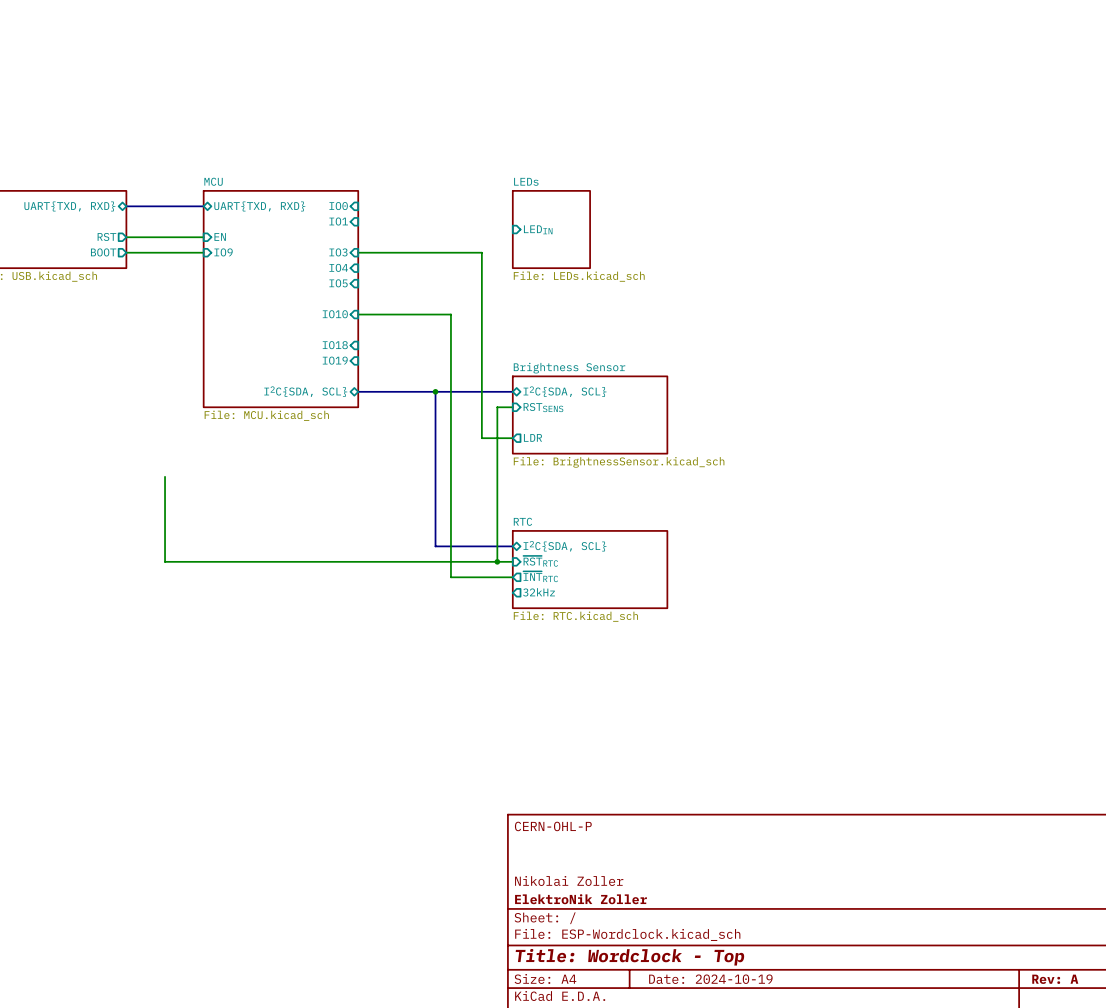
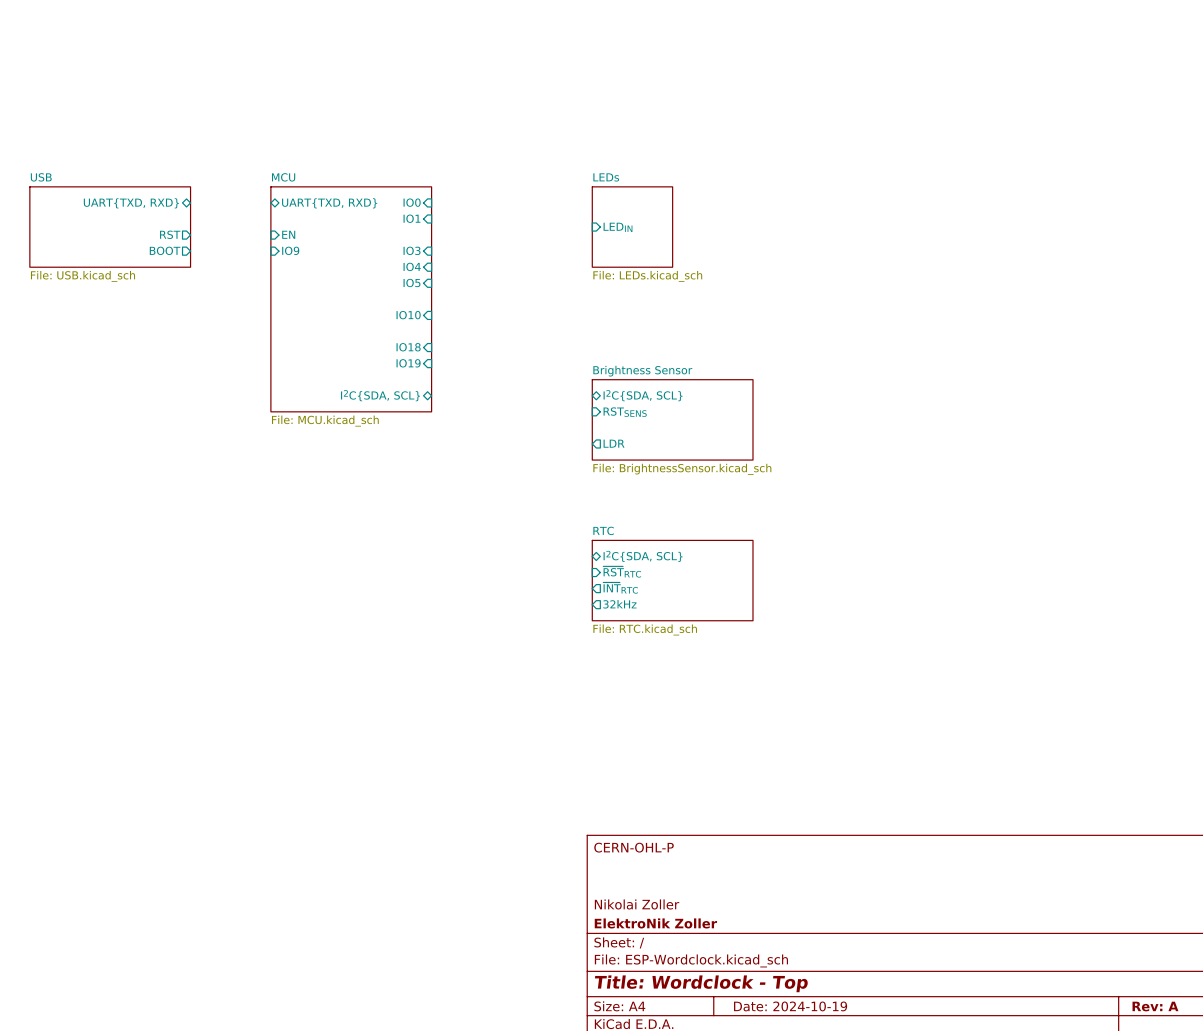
bus: (126, 206) (203, 206) -> none
wire: (126, 237) (203, 237) -> none
wire: (126, 252) (203, 252) -> none
wire: (358, 252) (481, 252) (481, 438) (512, 438) -> none
wire: (358, 314) (450, 314) (450, 577) (512, 577) -> none
bus: (358, 391) (512, 391) -> none
bus: (435, 391) (435, 546) (512, 546) -> none
junction: (435, 391) -> none
wire: (512, 407) (497, 407) (497, 561) -> none
wire: (165, 476) (165, 561) (512, 561) -> none
junction: (497, 561) -> none

